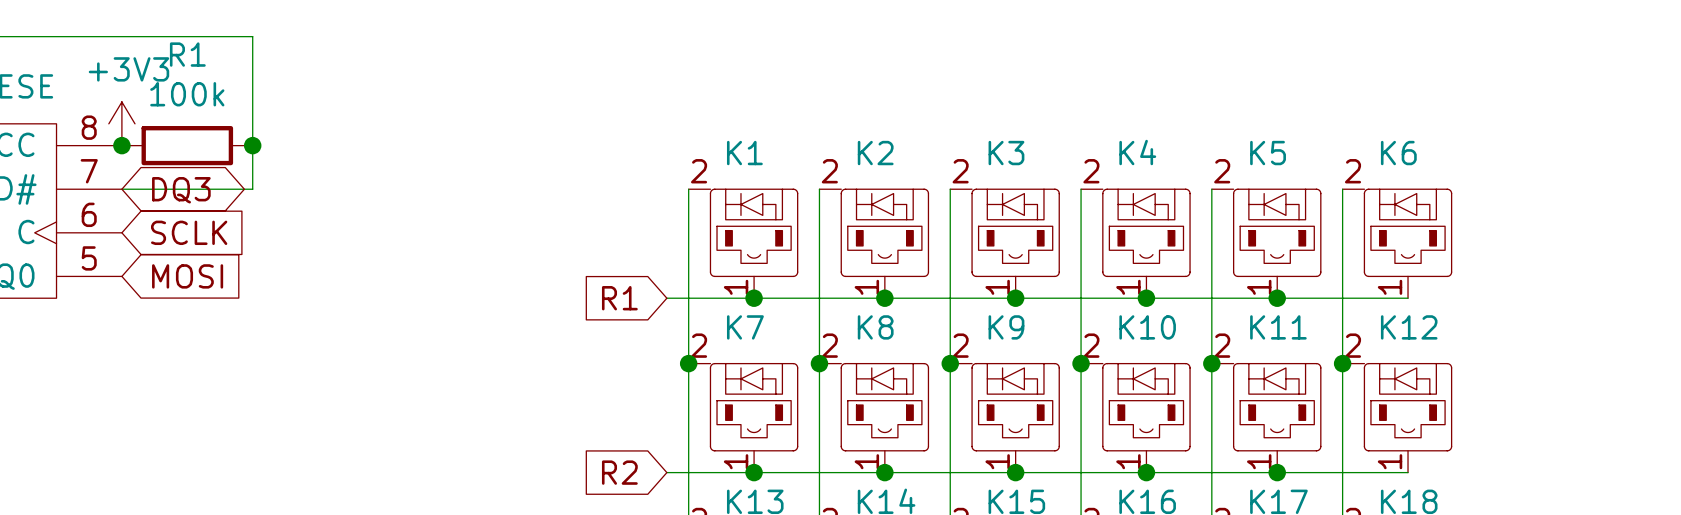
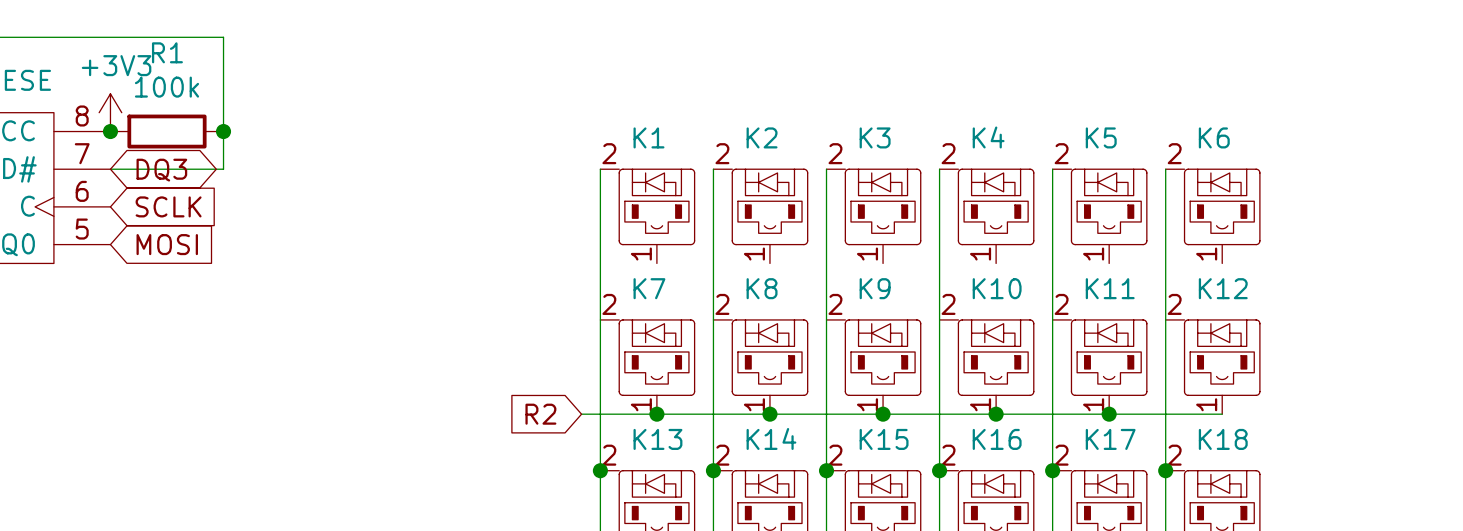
global label: R1 (619, 298) -> none
wire: (666, 298) (1408, 298) -> none
junction: (754, 298) -> none
junction: (884, 298) -> none
junction: (1015, 298) -> none
junction: (1146, 298) -> none
junction: (1277, 298) -> none
junction: (688, 363) -> none
junction: (819, 363) -> none
junction: (950, 363) -> none
junction: (1081, 363) -> none
junction: (1211, 363) -> none
junction: (1342, 363) -> none

